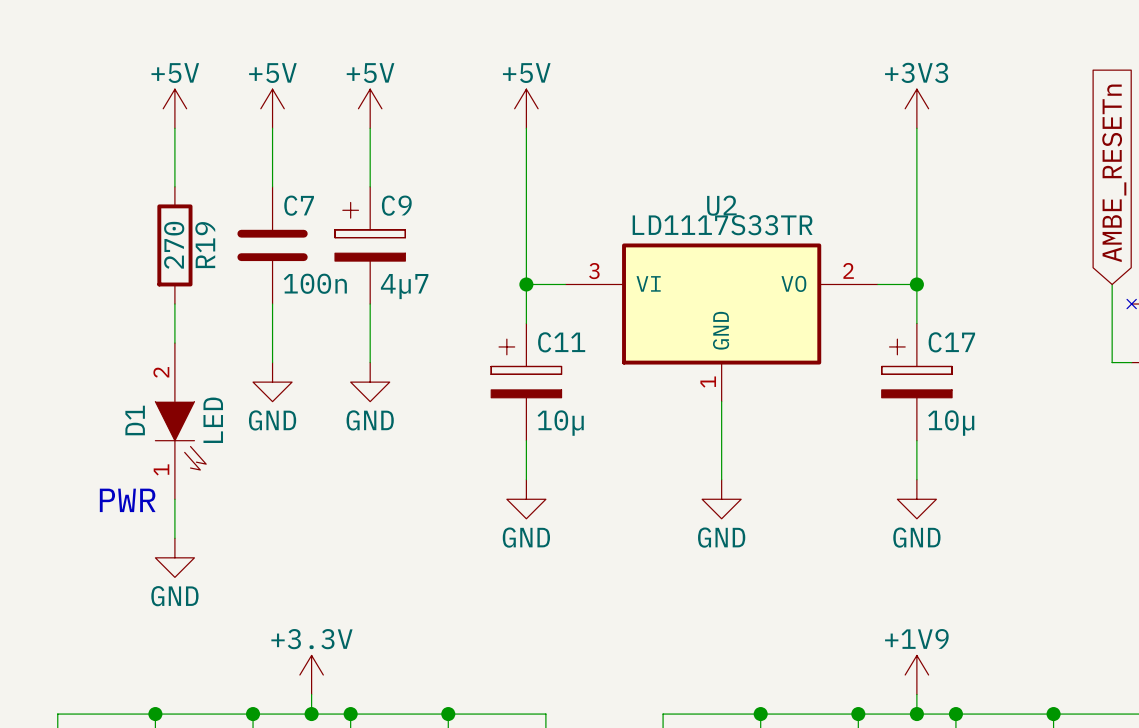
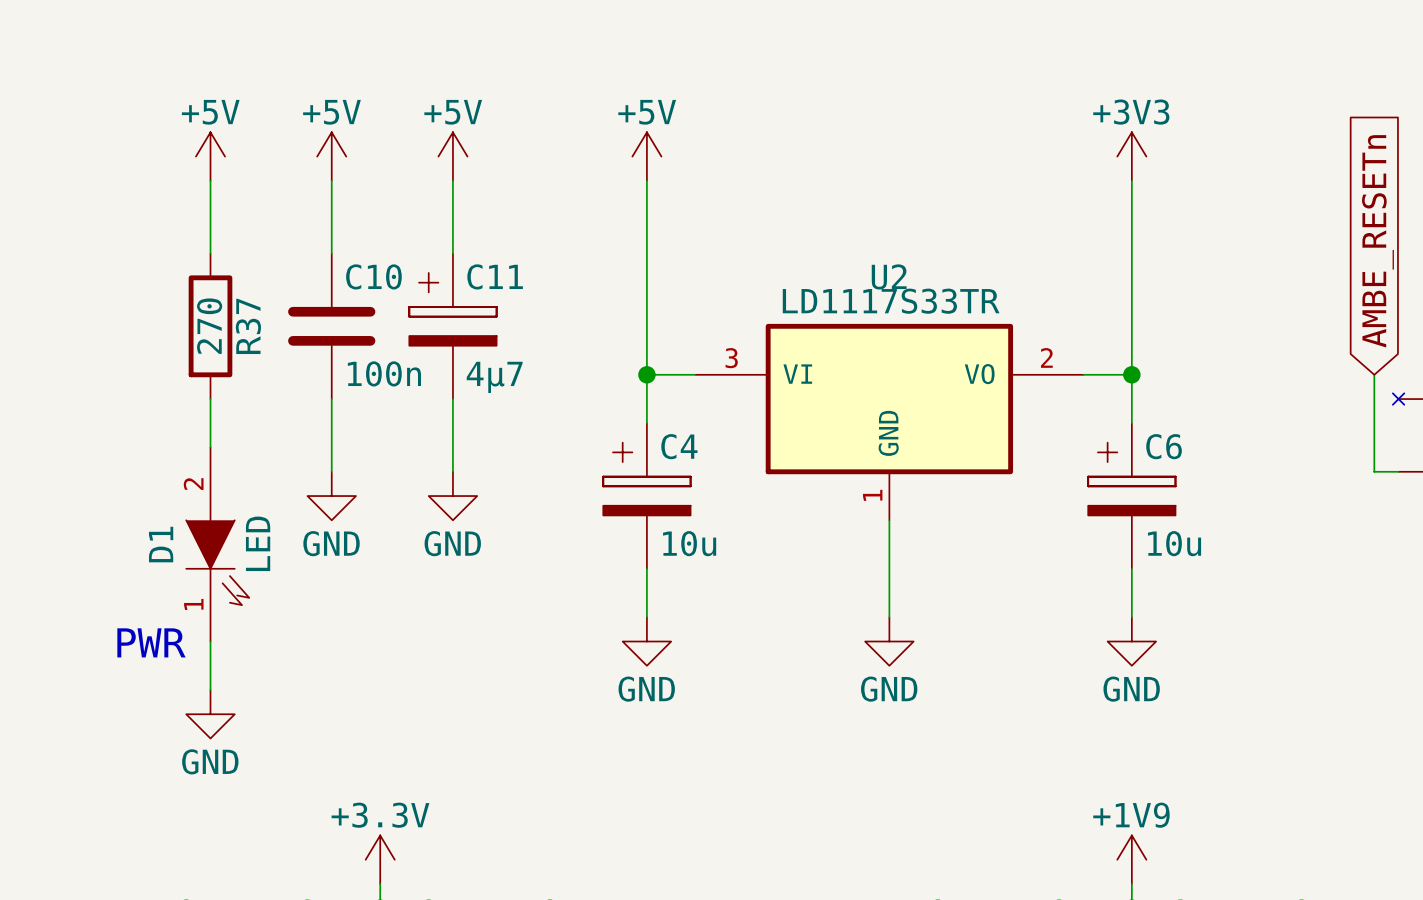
C7 name: C7 (299, 205) -> C10 (373, 276)
C9 name: C9 (396, 205) -> C11 (495, 276)
R19 name: R19 (205, 245) -> R37 (248, 326)
C11 name: C11 (561, 342) -> C4 (679, 446)
C17 name: C17 (951, 342) -> C6 (1164, 446)
C11 value: 10µ (560, 423) -> 10u (689, 543)
C17 value: 10µ (951, 423) -> 10u (1174, 543)

